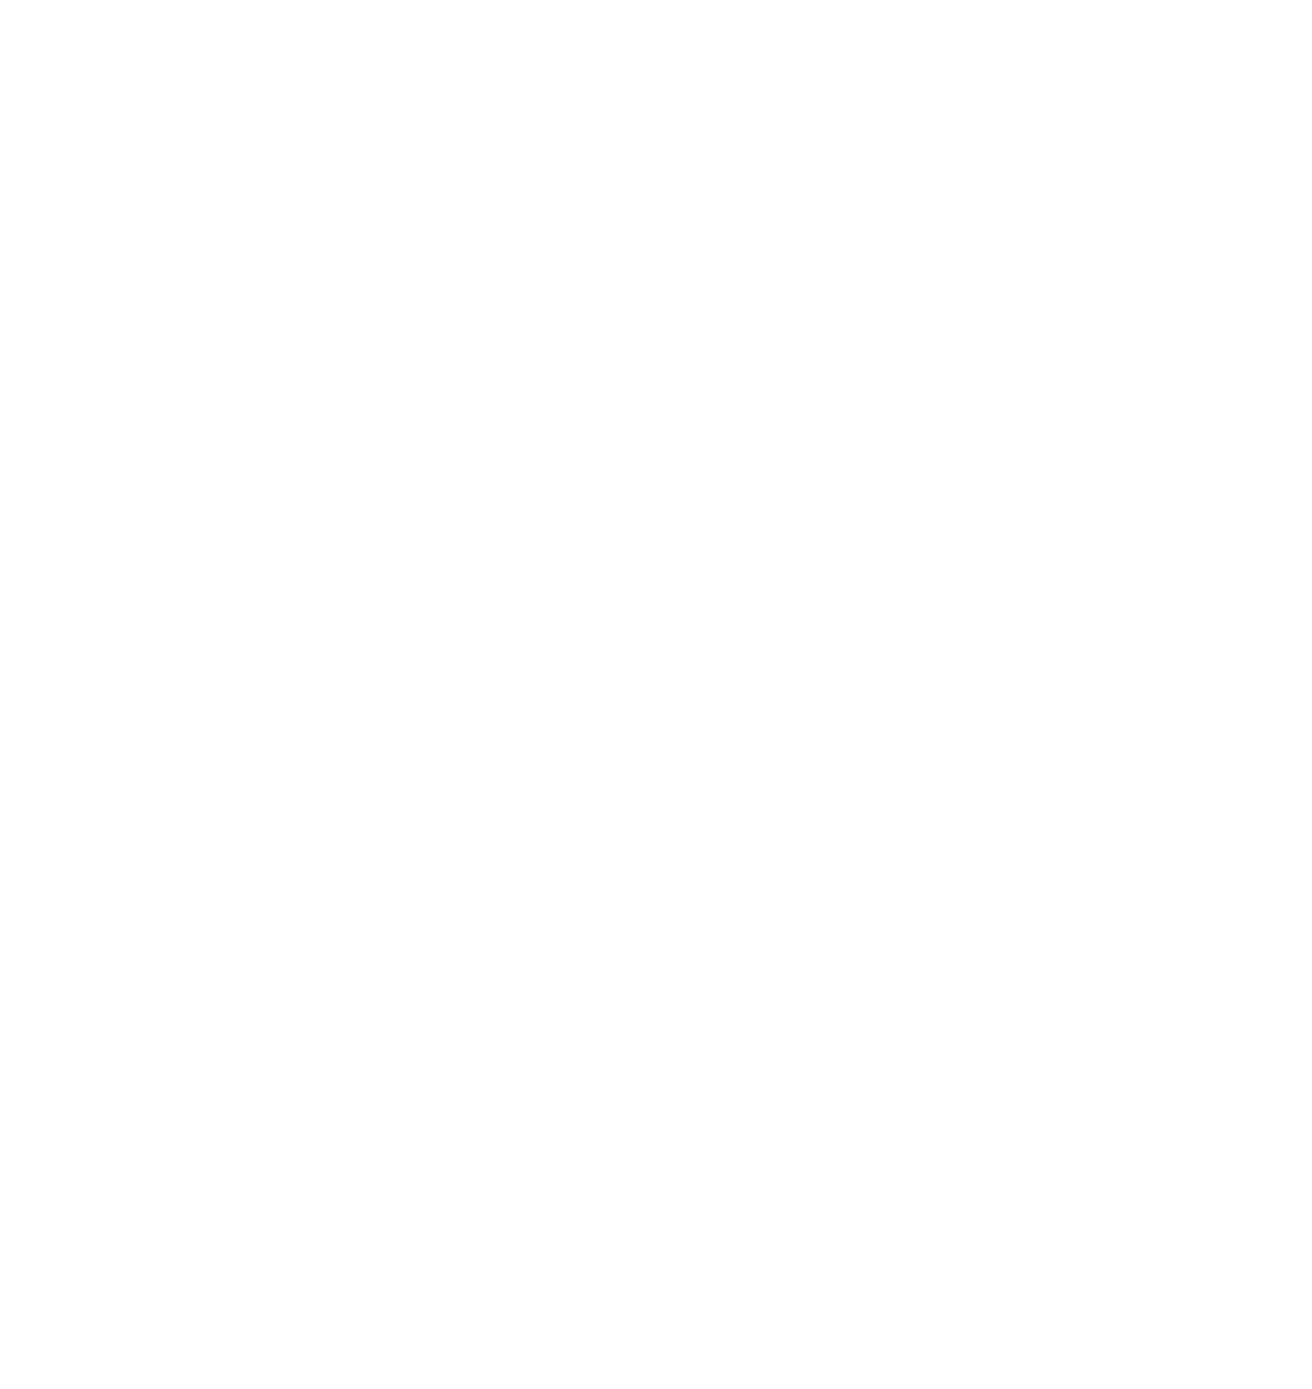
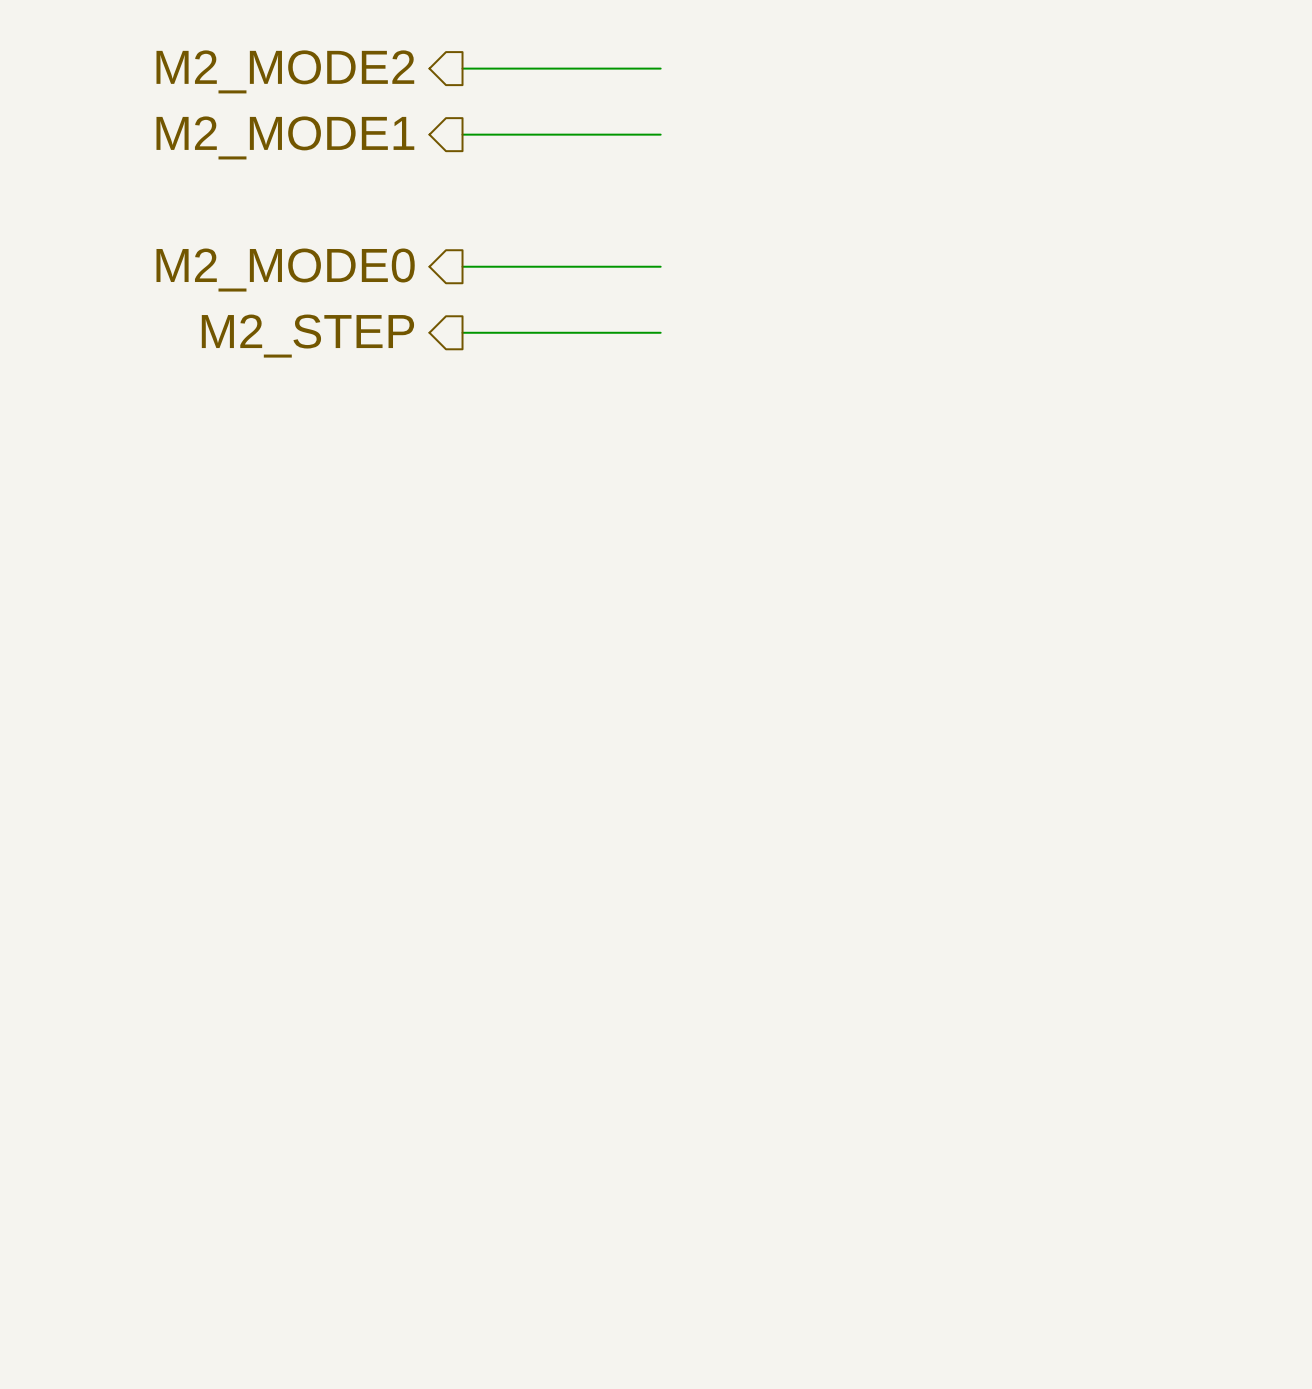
hierarchical label: none -> M2_MODE2 (285, 71)
wire: none -> (462, 68) (660, 68)
hierarchical label: none -> M2_MODE1 (285, 137)
wire: none -> (462, 134) (660, 134)
wire: none -> (462, 266) (660, 266)
hierarchical label: none -> M2_MODE0 (285, 270)
wire: none -> (462, 332) (660, 332)
hierarchical label: none -> M2_STEP (307, 336)

